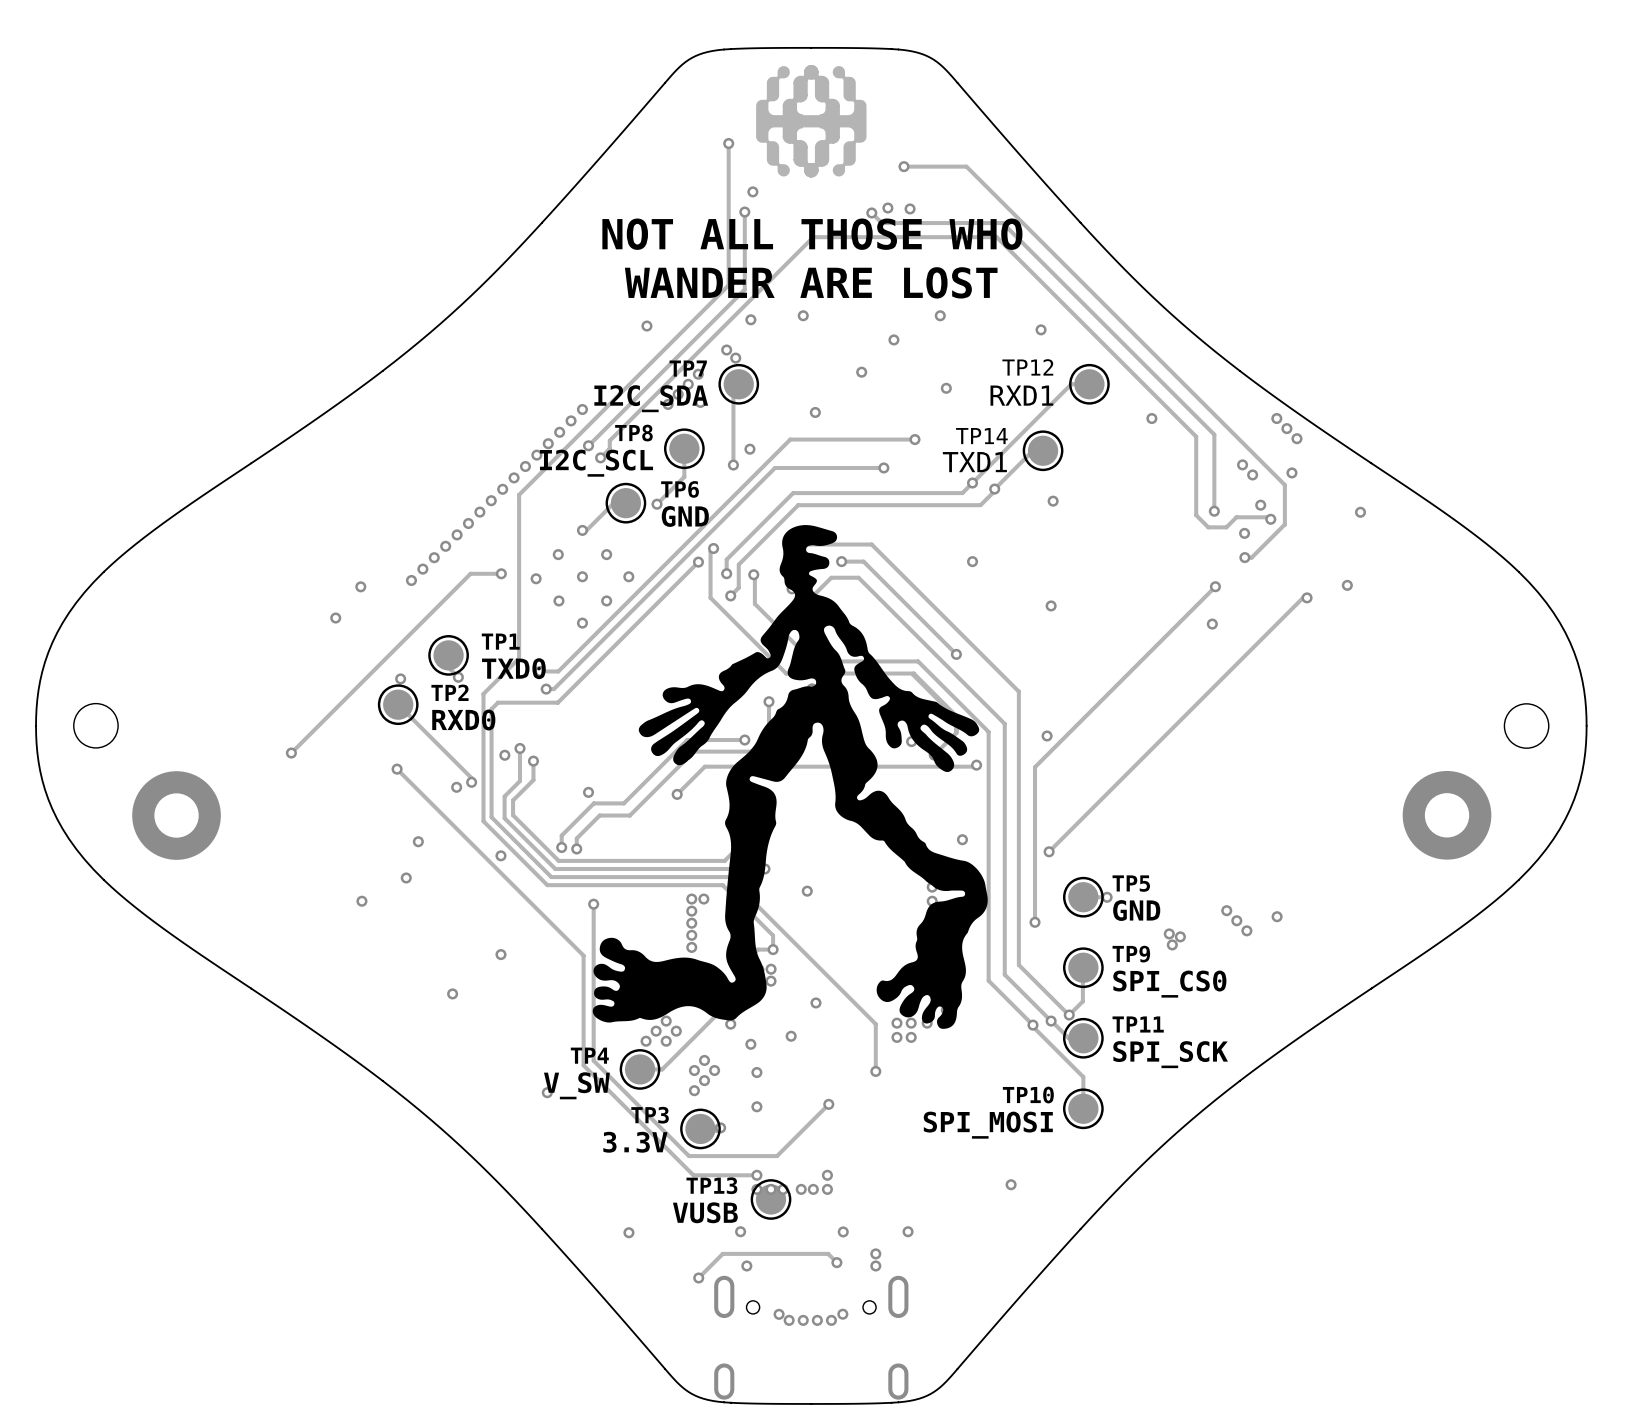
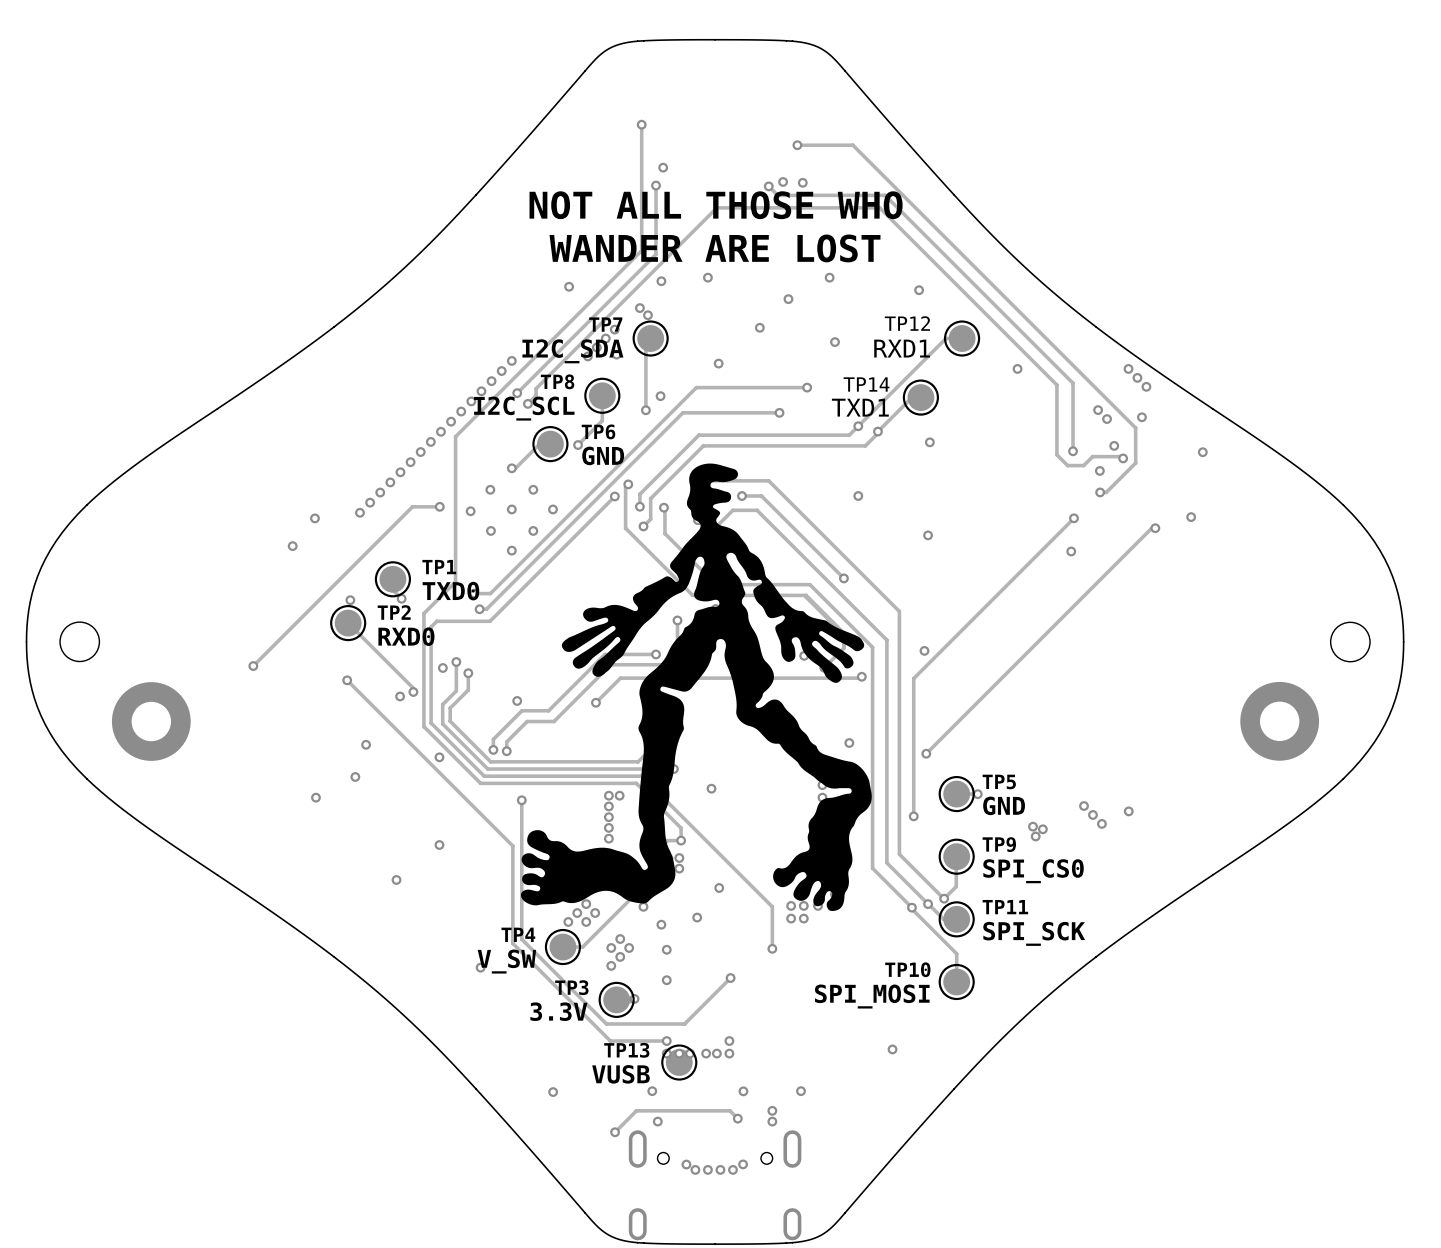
drawing: [756, 66, 867, 177] -> none
track: (805, 72) (804, 76) (798, 77) (794, 80) (794, 99) (786, 100) (783, 105) (784, 138) (787, 142) (794, 143) (794, 161) (798, 165) (804, 165) (805, 170) -> none
track: (817, 72) (817, 76) (824, 77) (827, 80) (828, 99) (836, 100) (838, 105) (838, 138) (835, 142) (828, 143) (827, 161) (824, 165) (817, 165) (817, 170) -> none
track: (820, 115) (825, 111) (826, 102) (816, 98) (815, 79) (808, 78) (806, 80) (805, 98) (796, 102) (796, 111) (802, 115) -> none
track: (820, 127) (825, 130) (826, 139) (816, 143) (815, 162) (808, 164) (806, 162) (805, 144) (796, 139) (796, 130) (802, 127) -> none

